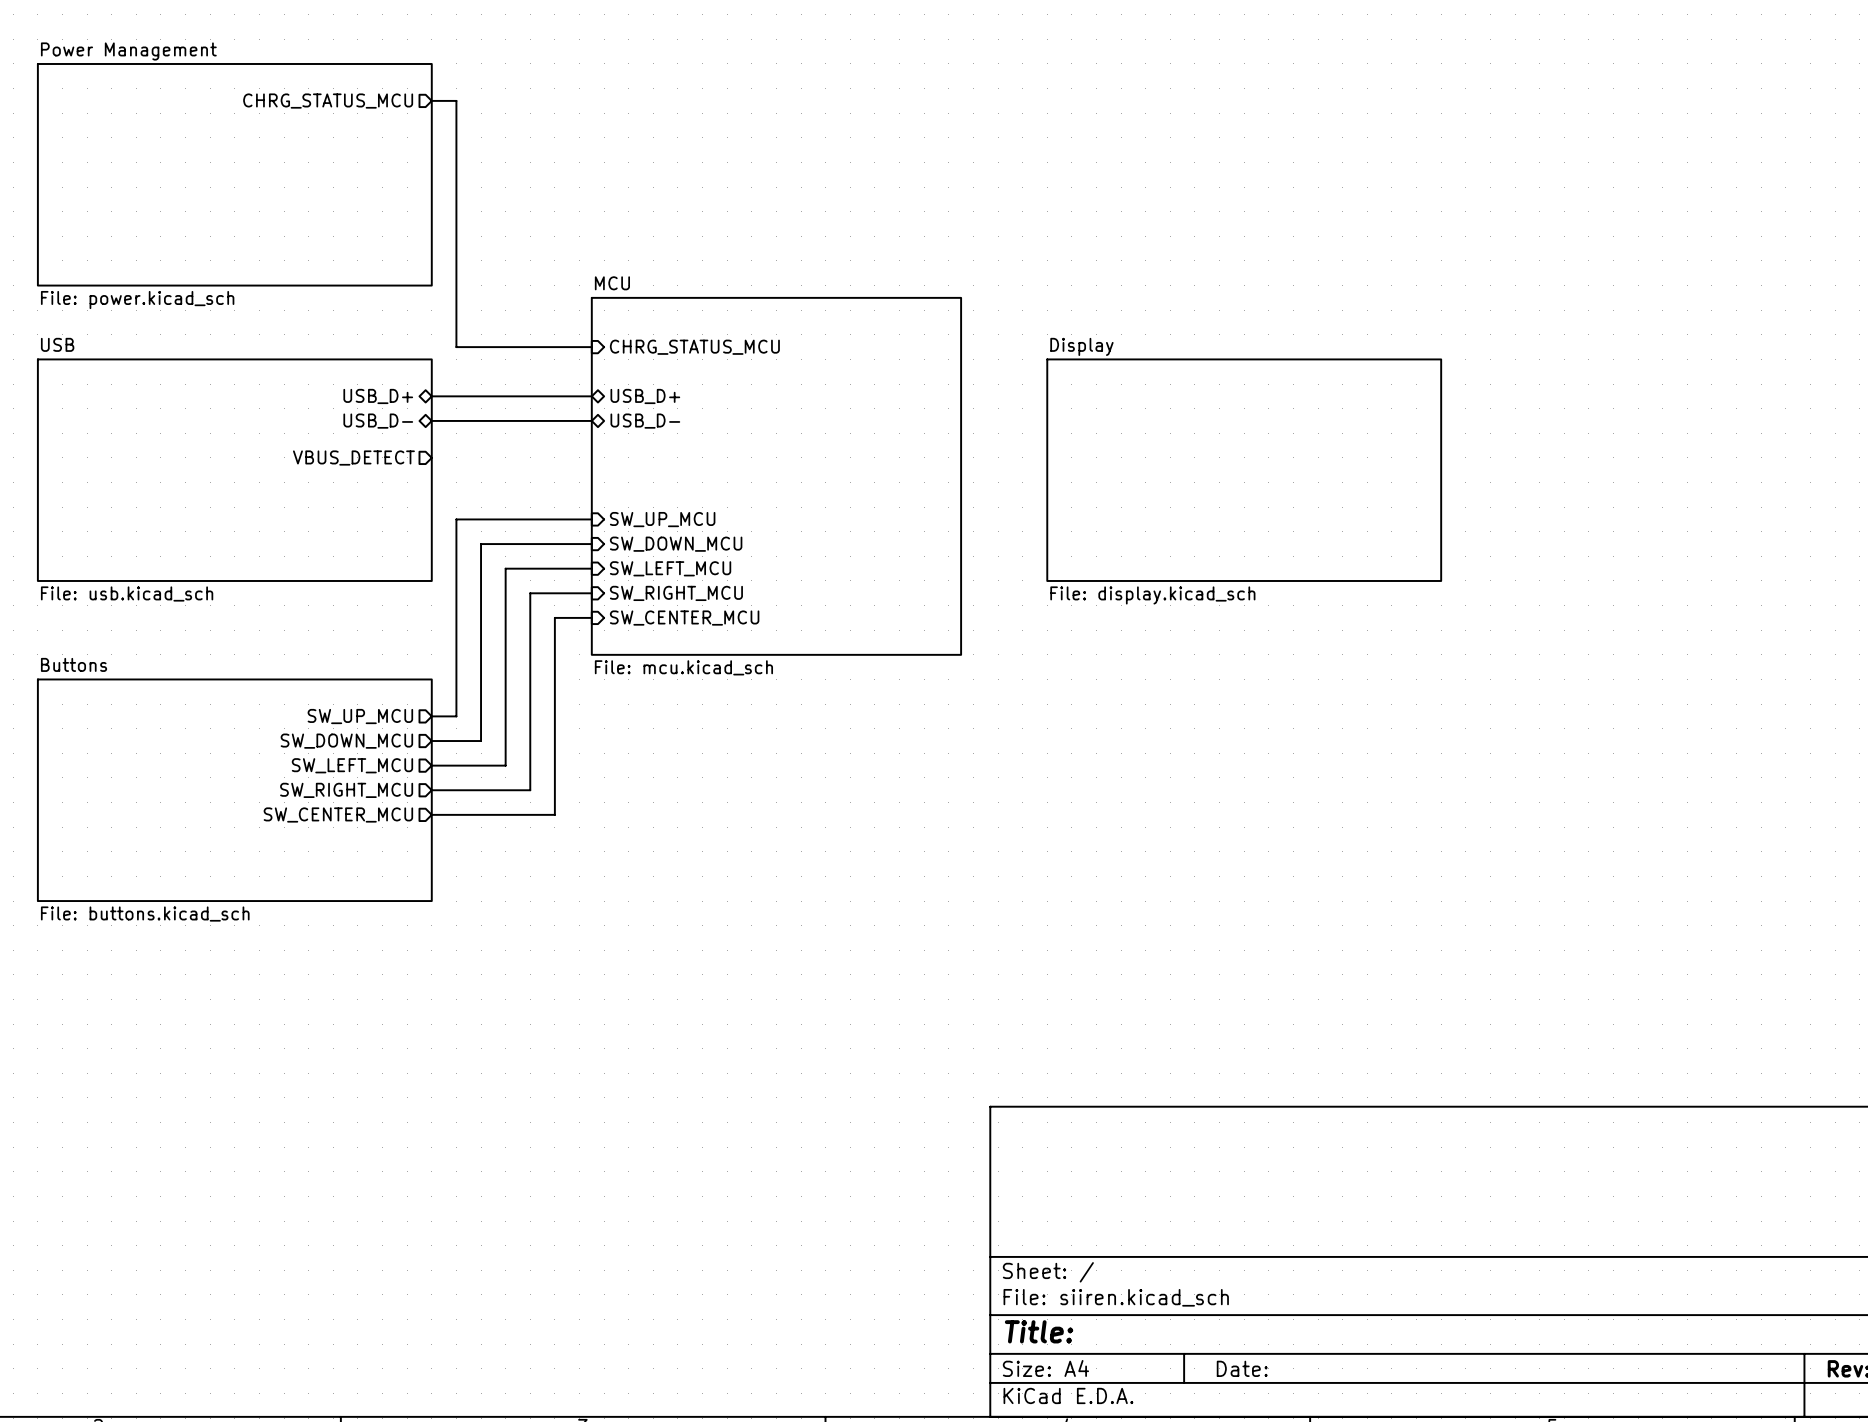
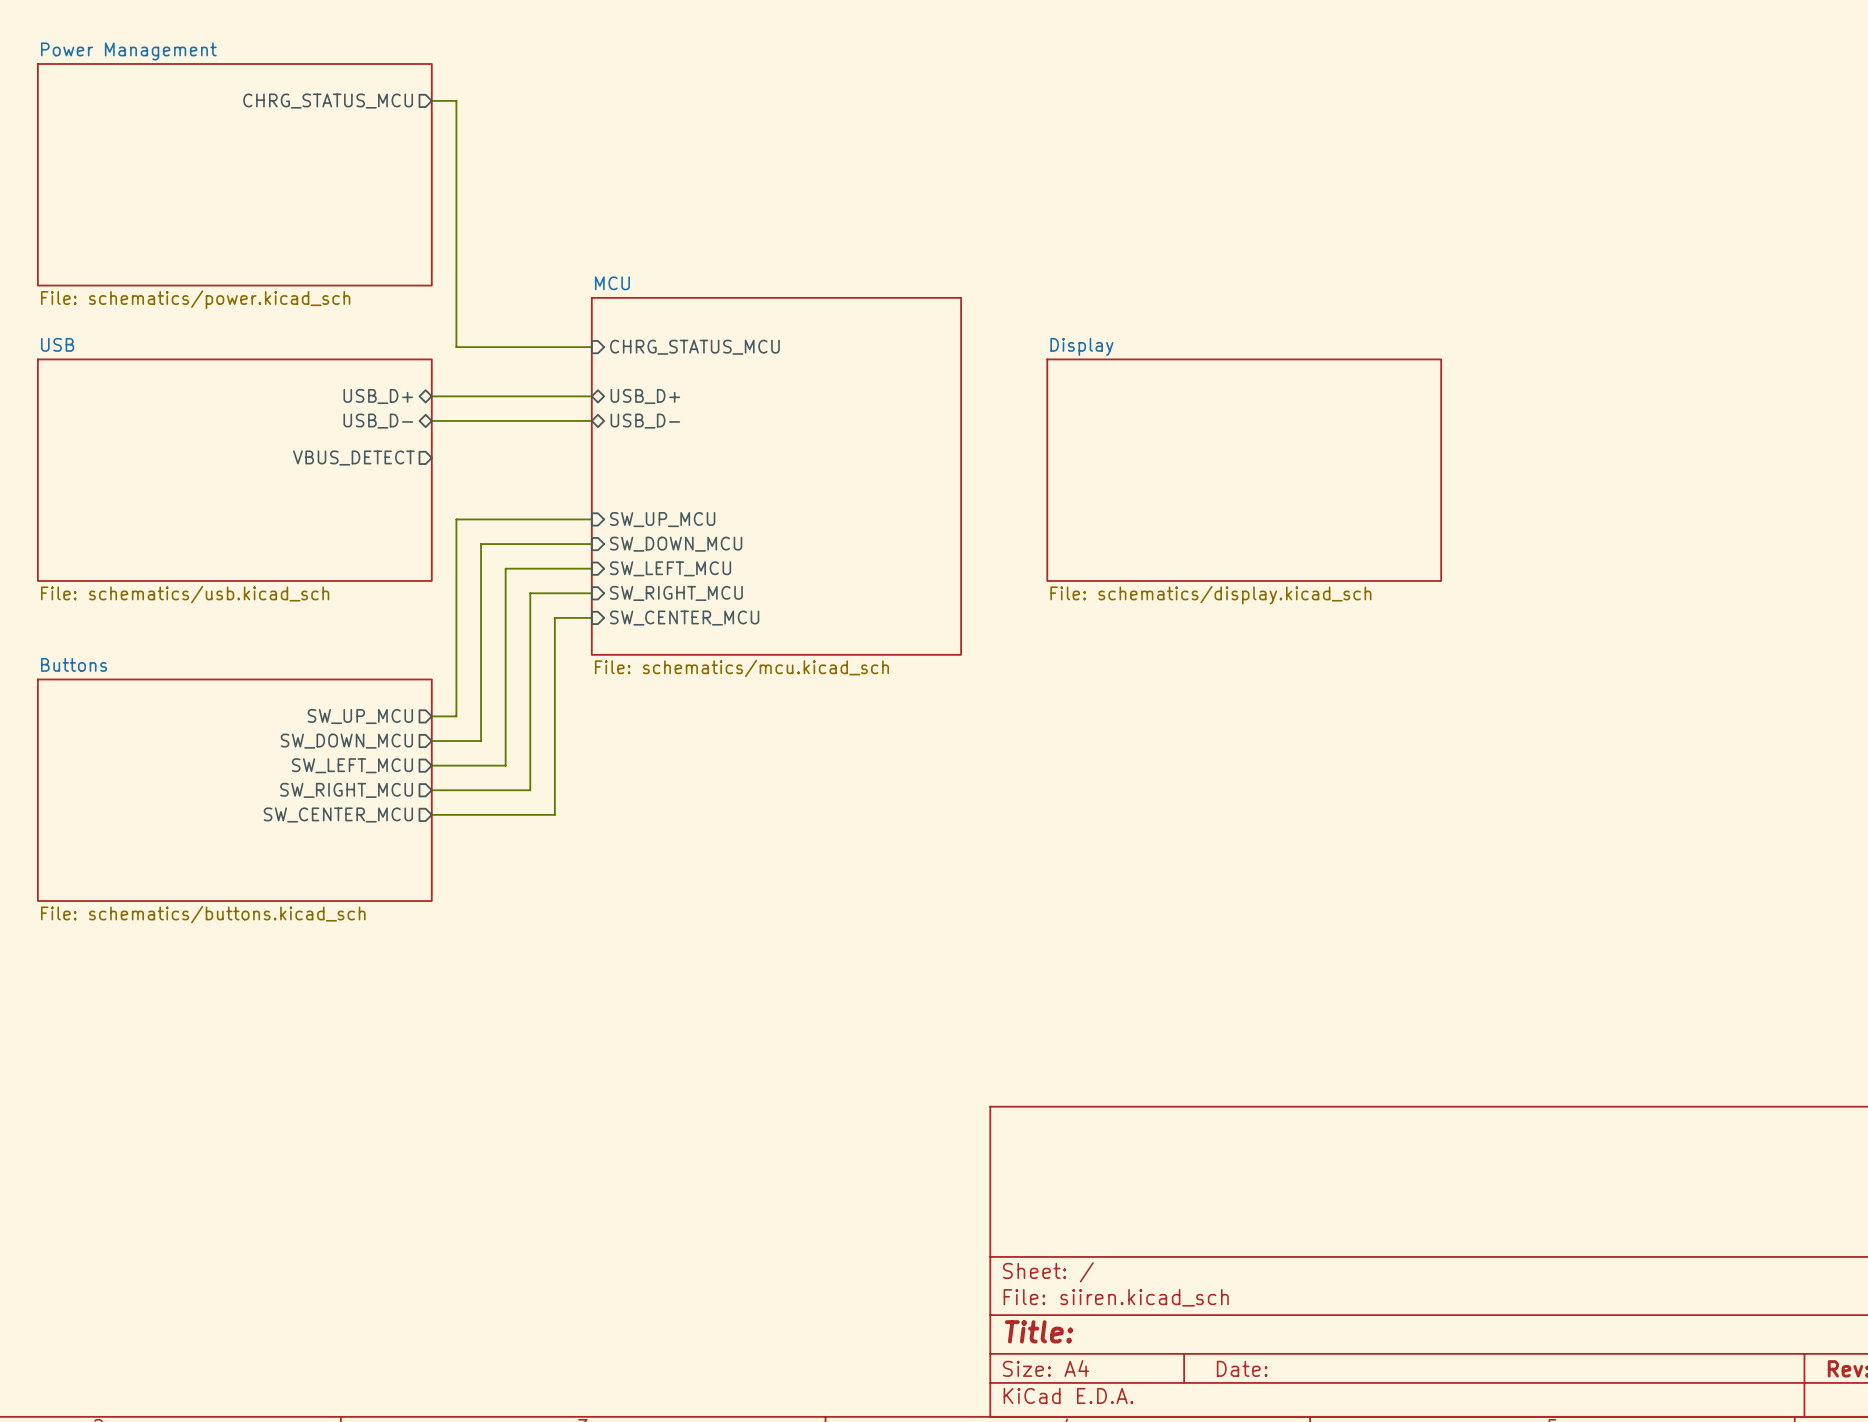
sheet Power Management value: File: power.kicad_sch (137, 300) -> File: schematics/power.kicad_sch (195, 299)
sheet USB value: File: usb.kicad_sch (127, 593) -> File: schematics/usb.kicad_sch (185, 594)
sheet Display value: File: display.kicad_sch (1152, 595) -> File: schematics/display.kicad_sch (1210, 595)
sheet MCU value: File: mcu.kicad_sch (683, 667) -> File: schematics/mcu.kicad_sch (741, 668)
sheet Buttons value: File: buttons.kicad_sch (145, 914) -> File: schematics/buttons.kicad_sch (203, 914)

